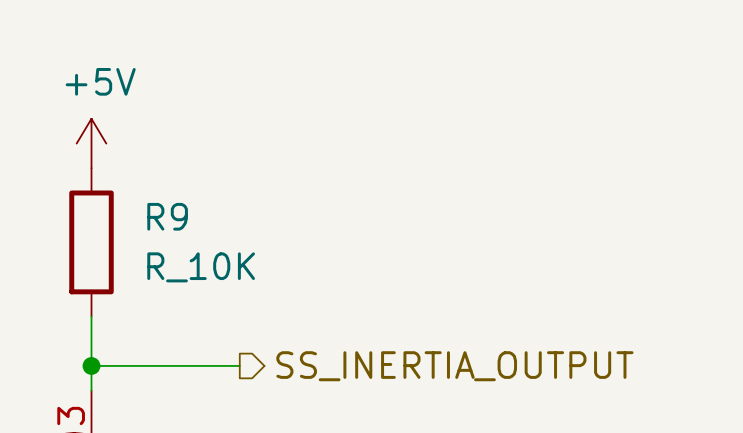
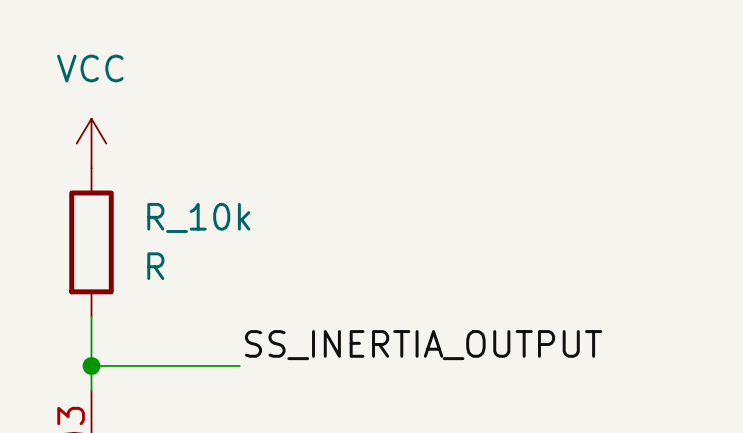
power symbol: +5V (91, 143) -> VCC (91, 143)
R9 name: R9 (167, 216) -> R_10k (198, 217)
R9 value: R_10K (201, 267) -> R (155, 266)
label: none -> SS_INERTIA_OUTPUT (423, 345)
hierarchical label: SS_INERTIA_OUTPUT (454, 366) -> none

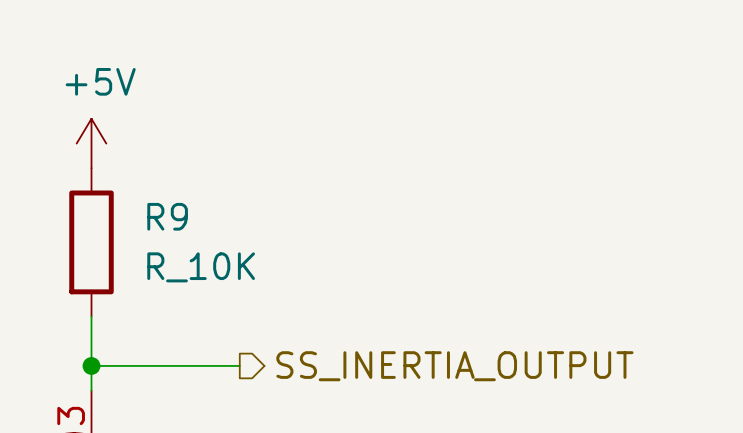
power symbol: VCC (91, 143) -> +5V (91, 143)
R_10k name: R_10k (198, 217) -> R9 (167, 216)
R_10k value: R (155, 266) -> R_10K (201, 267)
label: SS_INERTIA_OUTPUT (423, 345) -> none
hierarchical label: none -> SS_INERTIA_OUTPUT (454, 366)

